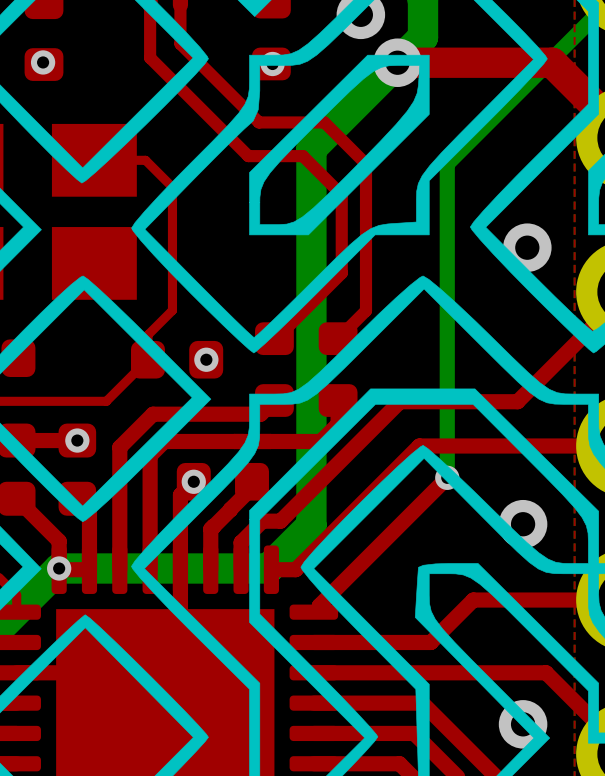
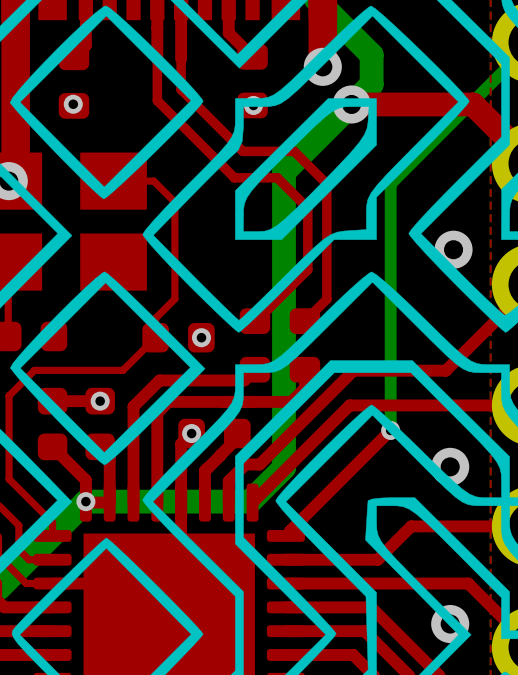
top track: (419, 445) (295, 569) (271, 569) -> (368, 405) (349, 405) (252, 502)

